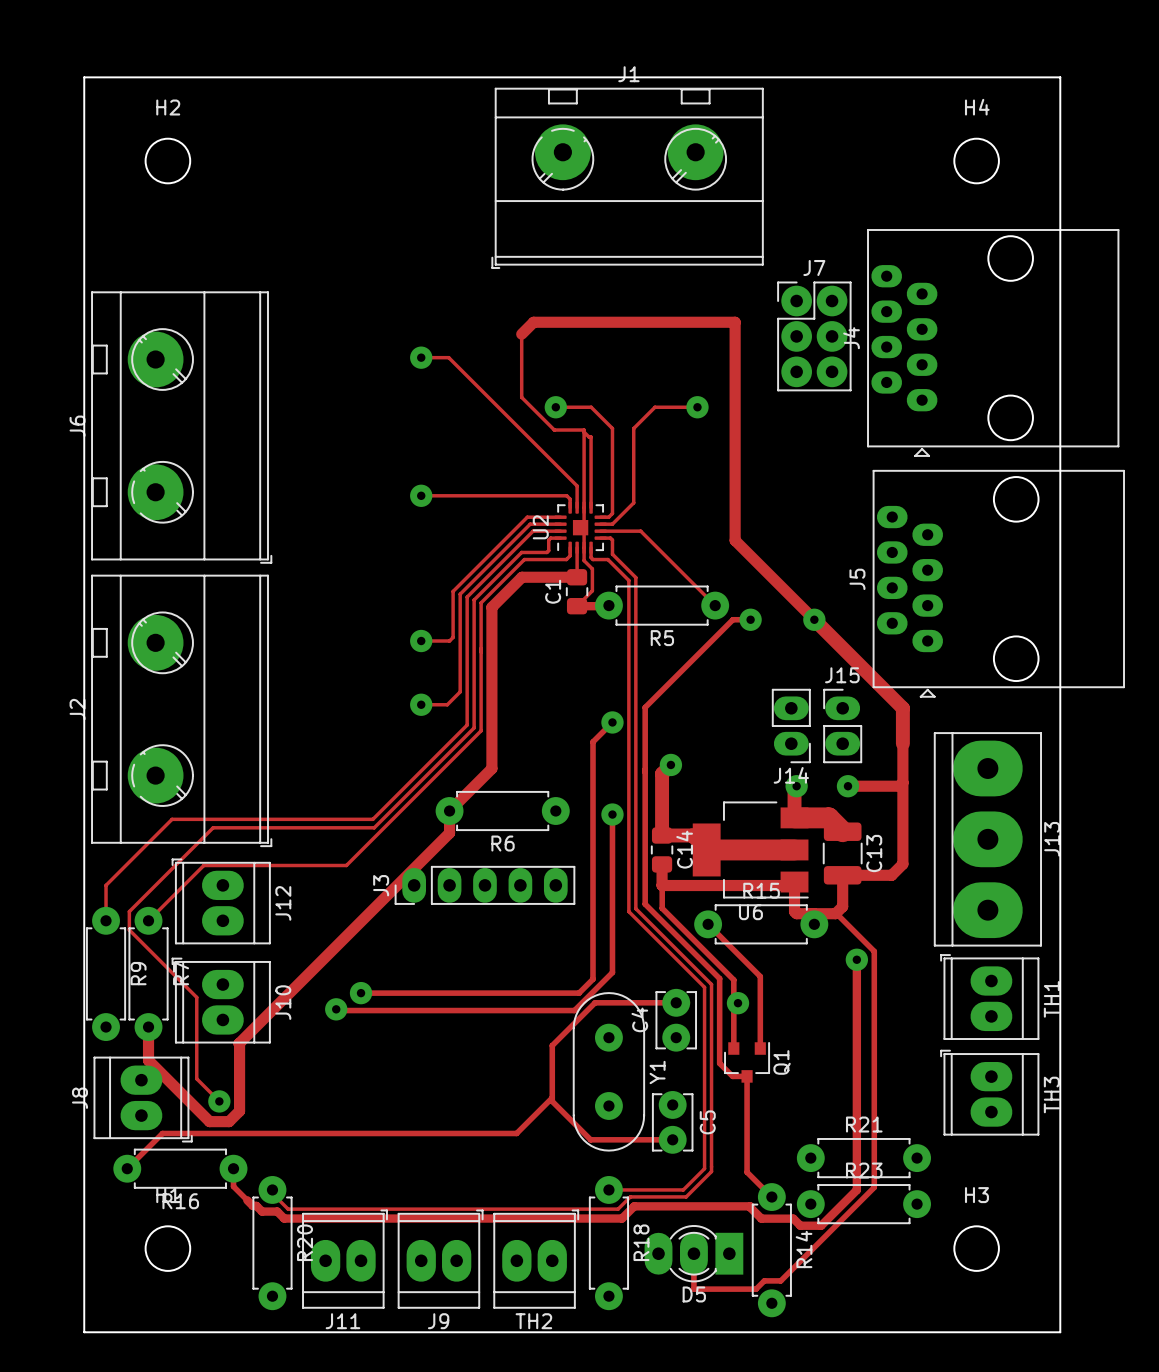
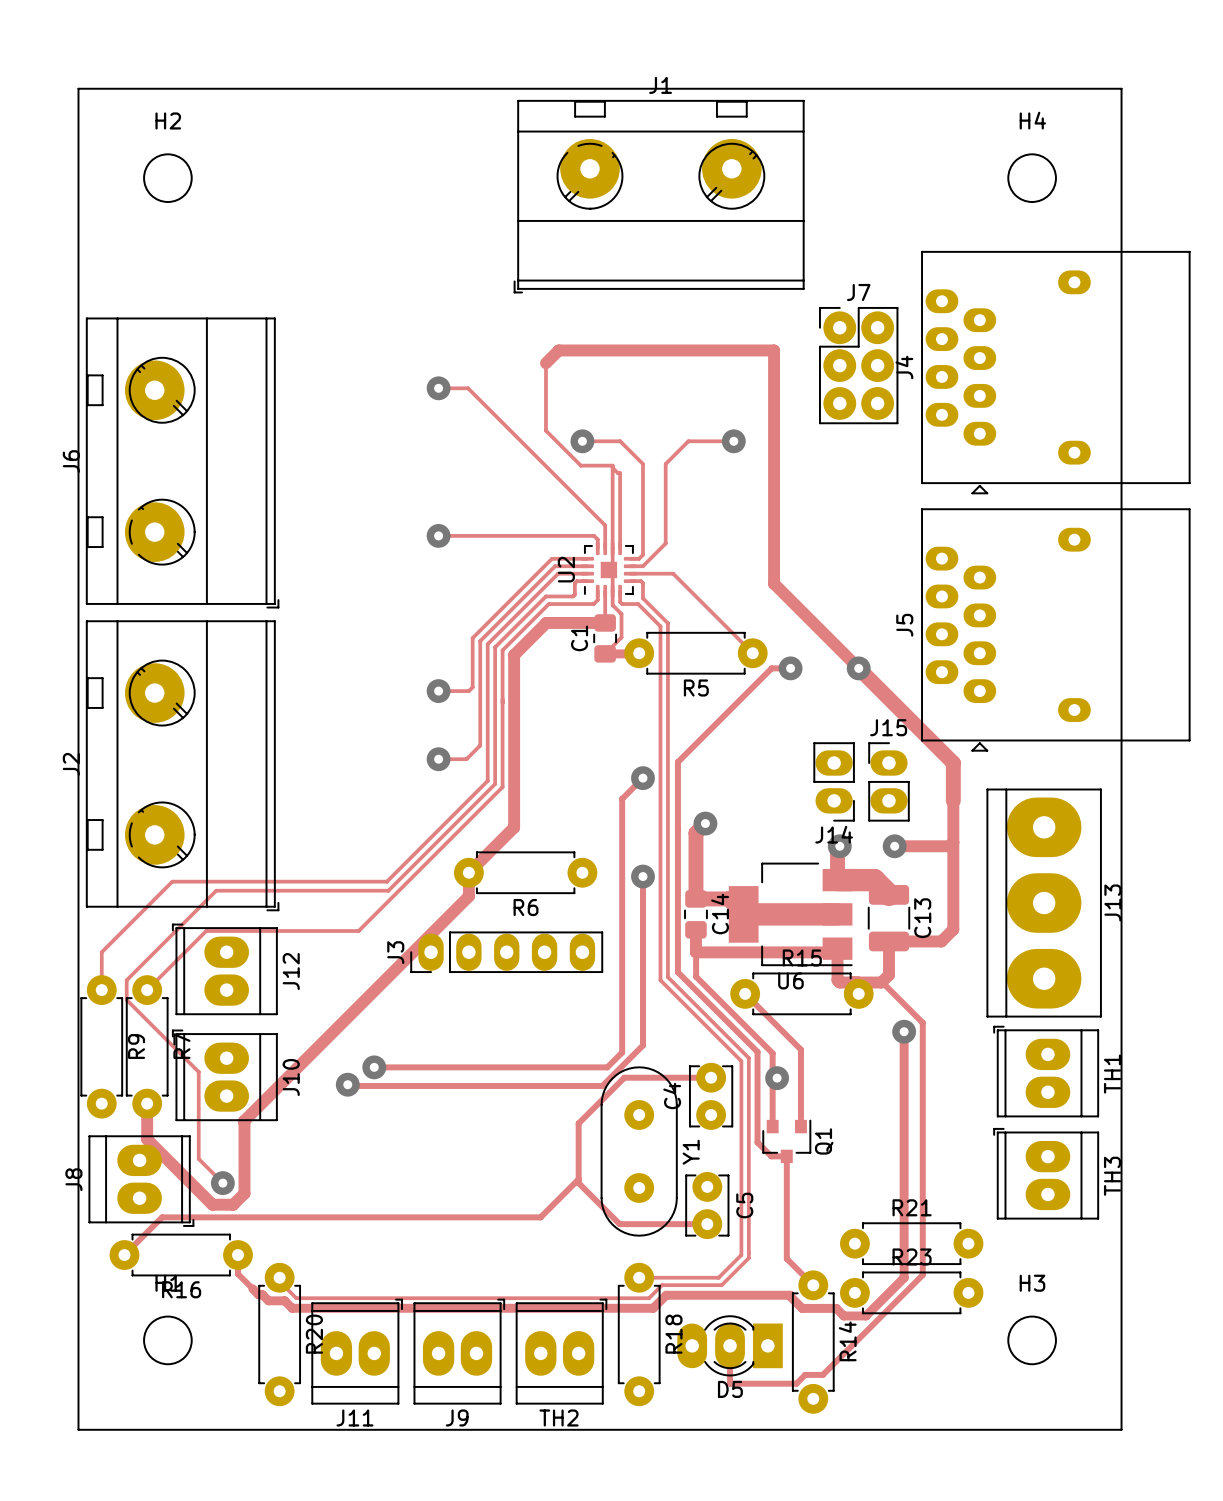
J4 footprint: [867, 229, 1120, 457] -> [921, 250, 1191, 495]
J5 footprint: [872, 469, 1125, 698] -> [921, 508, 1191, 752]

